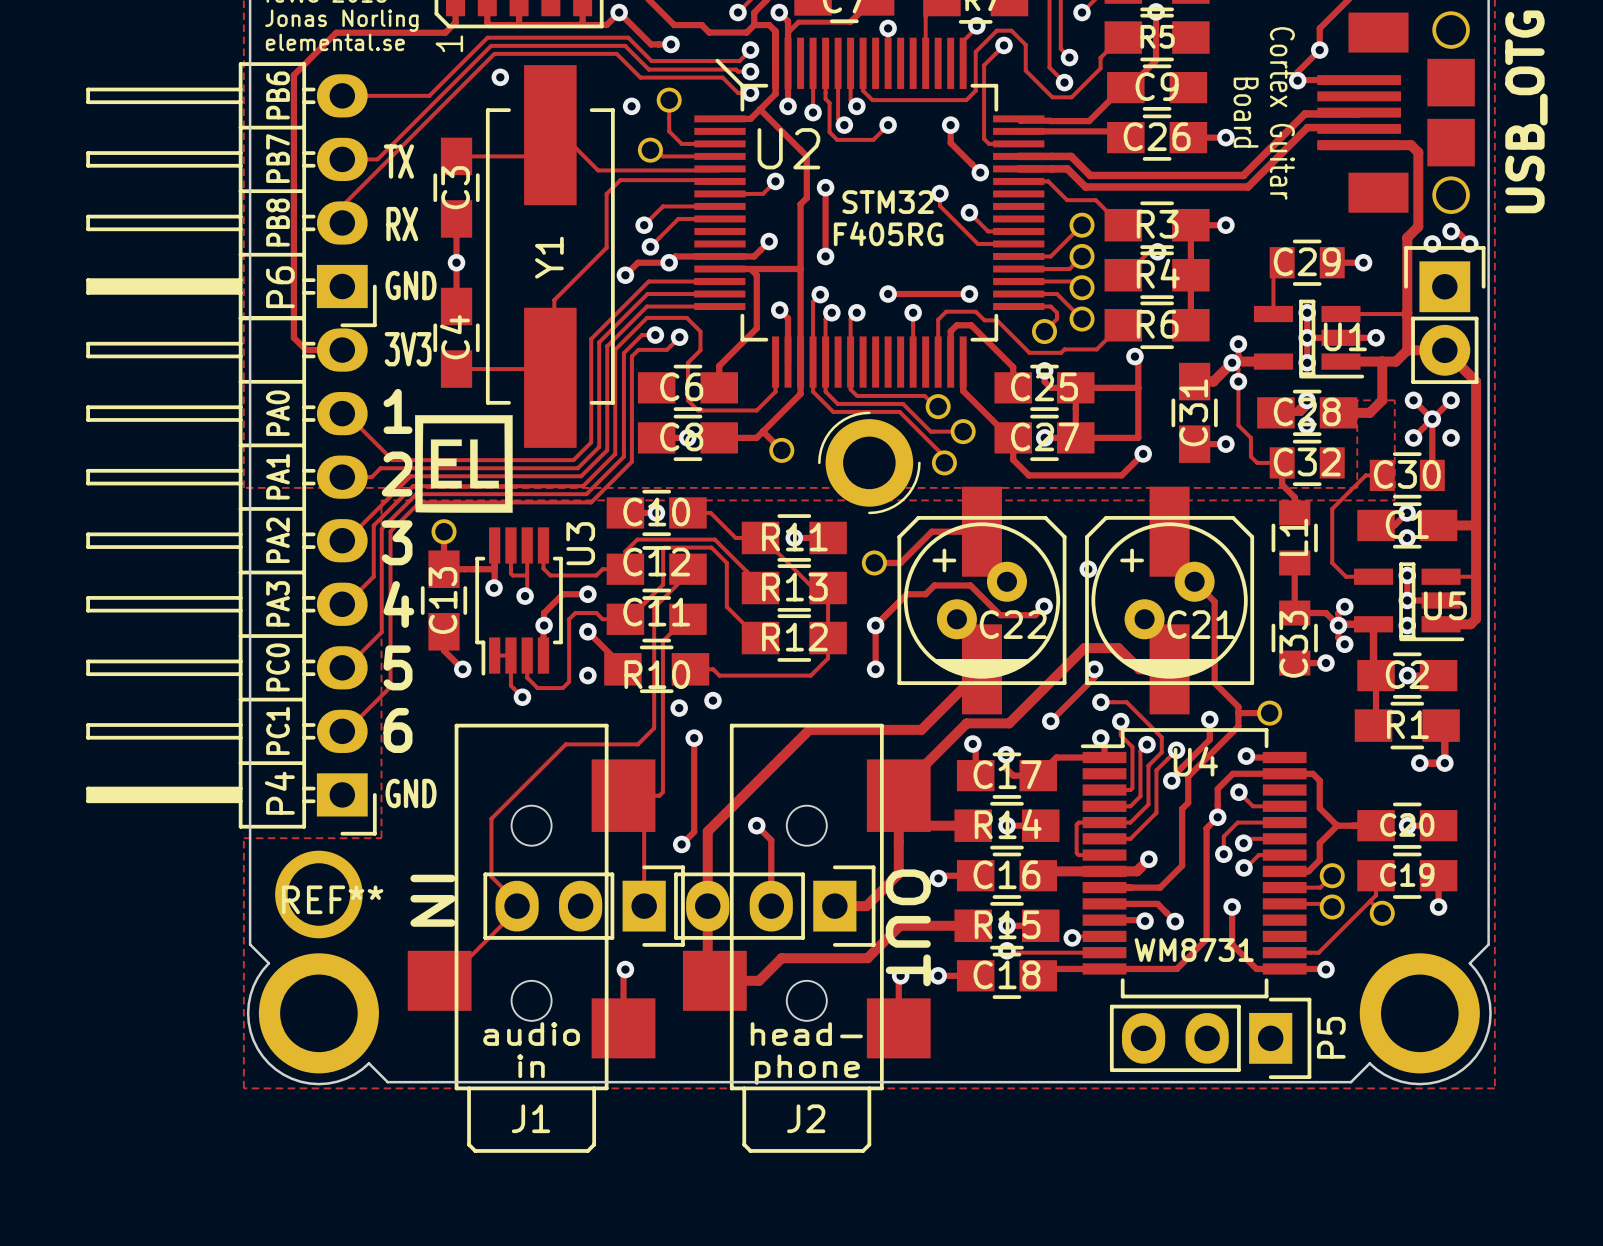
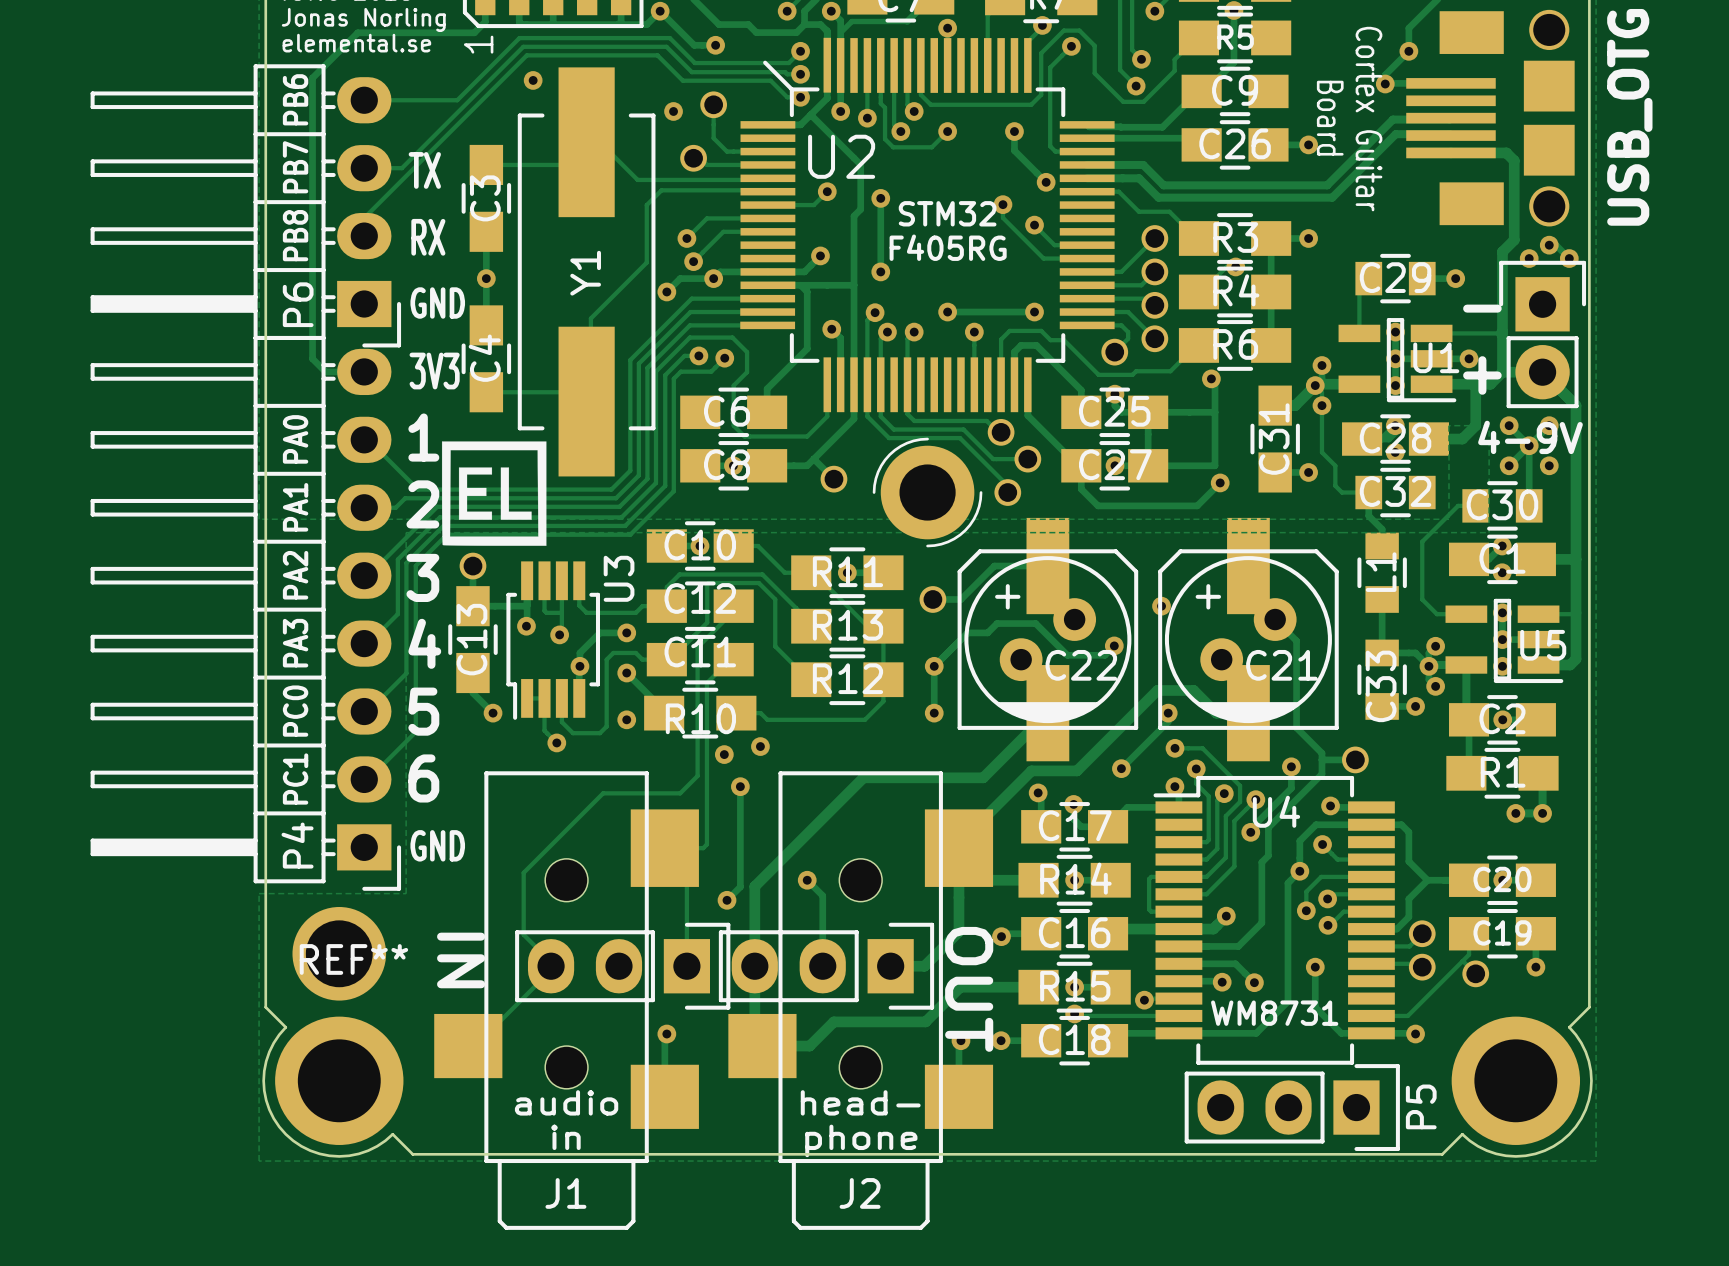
text: none -> - (1482, 308)
text: none -> + (1482, 375)
text: none -> 4-9V (1530, 437)

